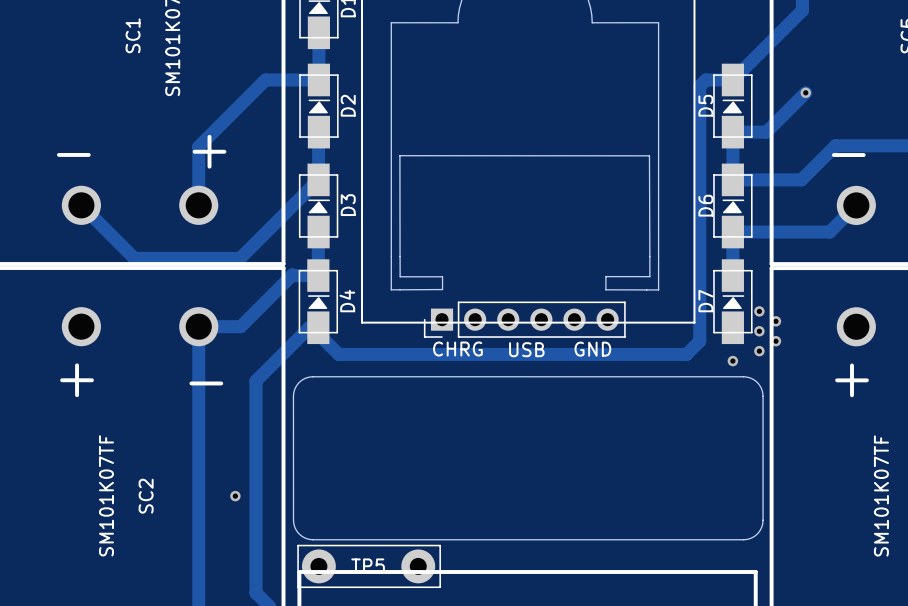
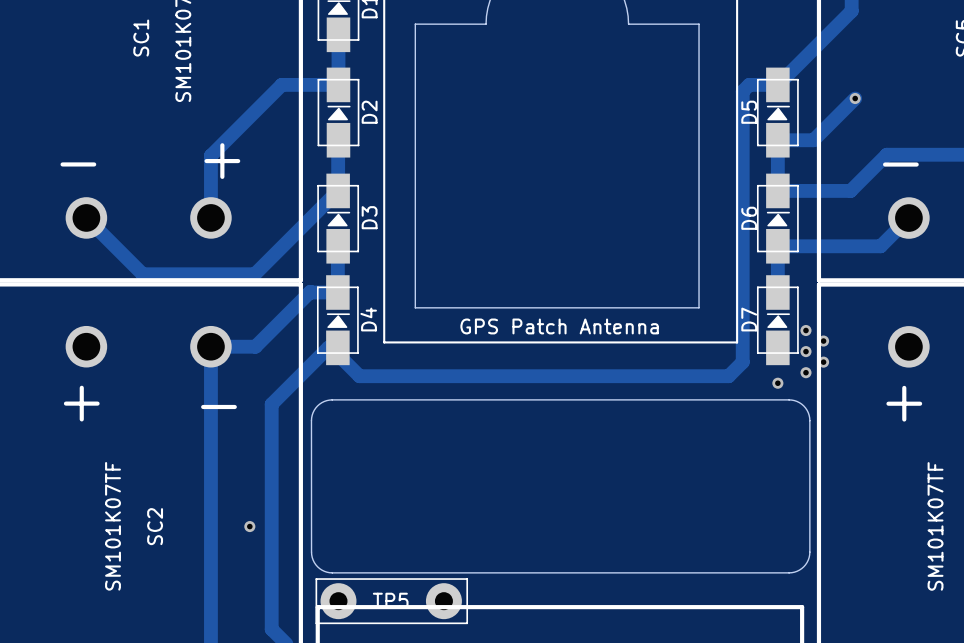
board edge: (391, 289) (442, 289) (442, 276) (400, 276) (399, 155) (649, 155) (649, 276) (605, 276) (605, 289) (658, 289) -> (415, 307) (699, 307)
text: none -> GPS Patch Antenna (559, 326)
part: (524, 319) -> none
text: CHRG (457, 349) -> none
text: USB (526, 349) -> none
text: GND (592, 349) -> none

